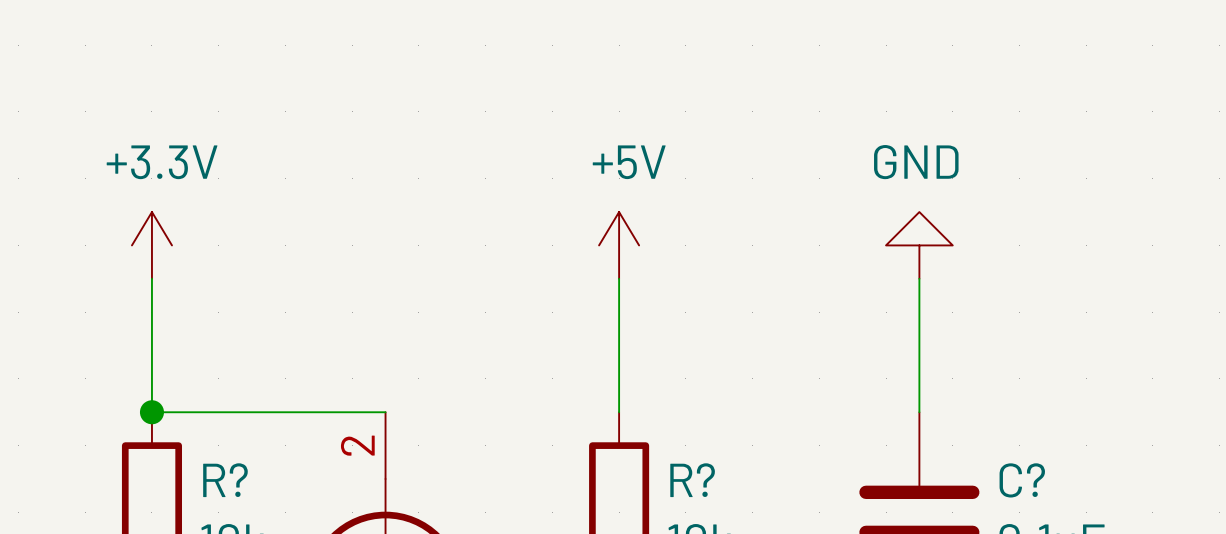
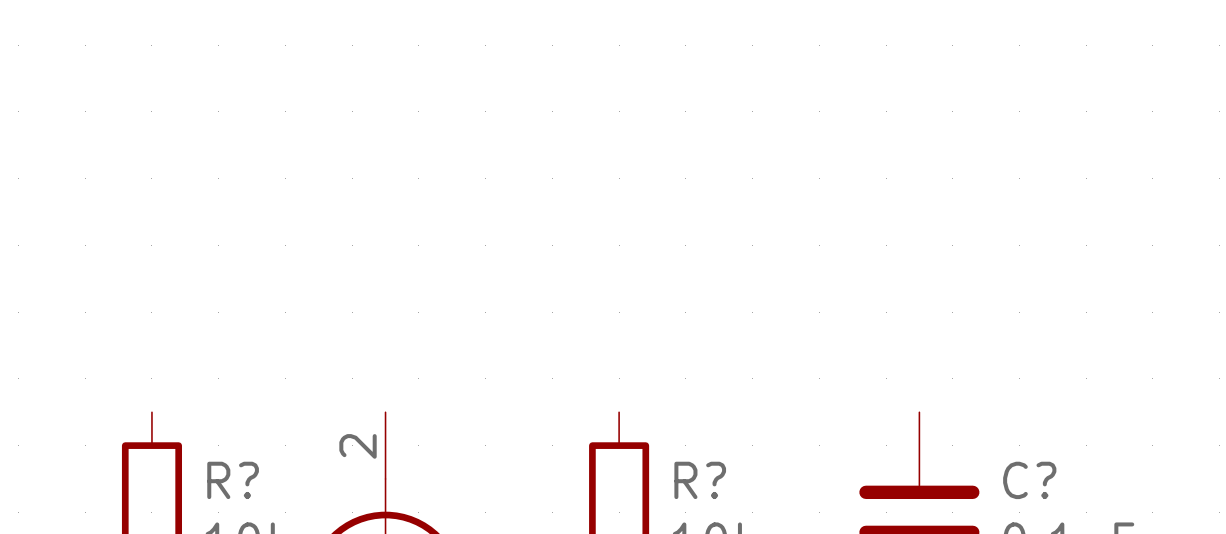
power symbol: +3.3V (151, 245) -> none
power symbol: +5V (619, 245) -> none
power symbol: GND (919, 245) -> none
wire: (151, 278) (151, 412) (385, 412) -> none
wire: (619, 278) (619, 412) -> none
wire: (919, 278) (919, 412) -> none
junction: (151, 412) -> none

